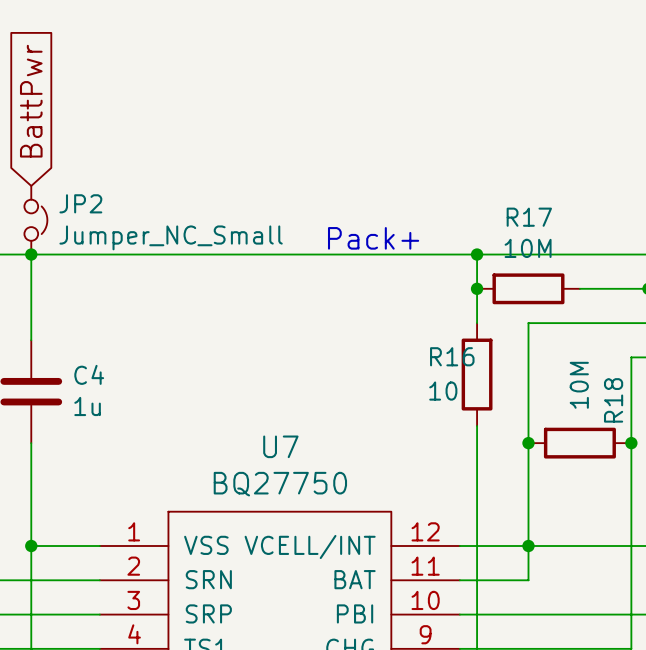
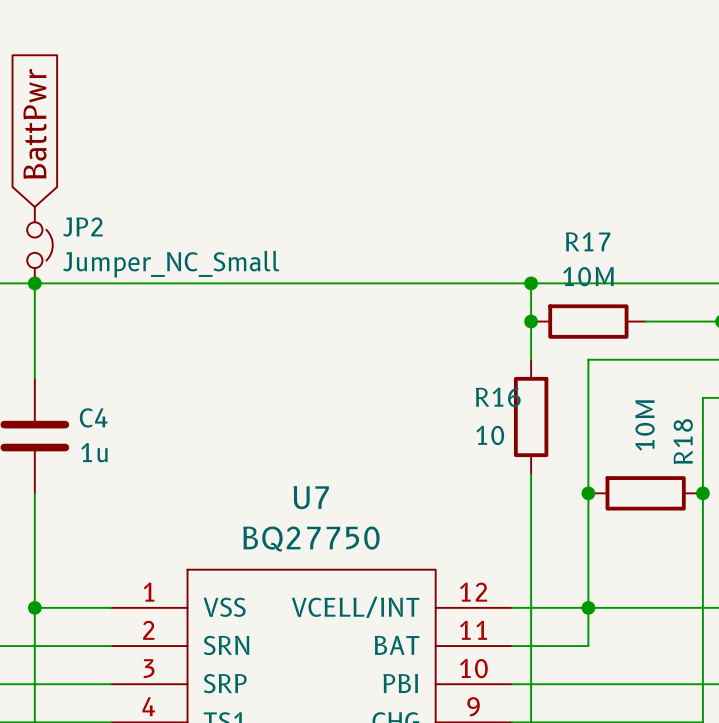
text: Pack+ (373, 238) -> none

